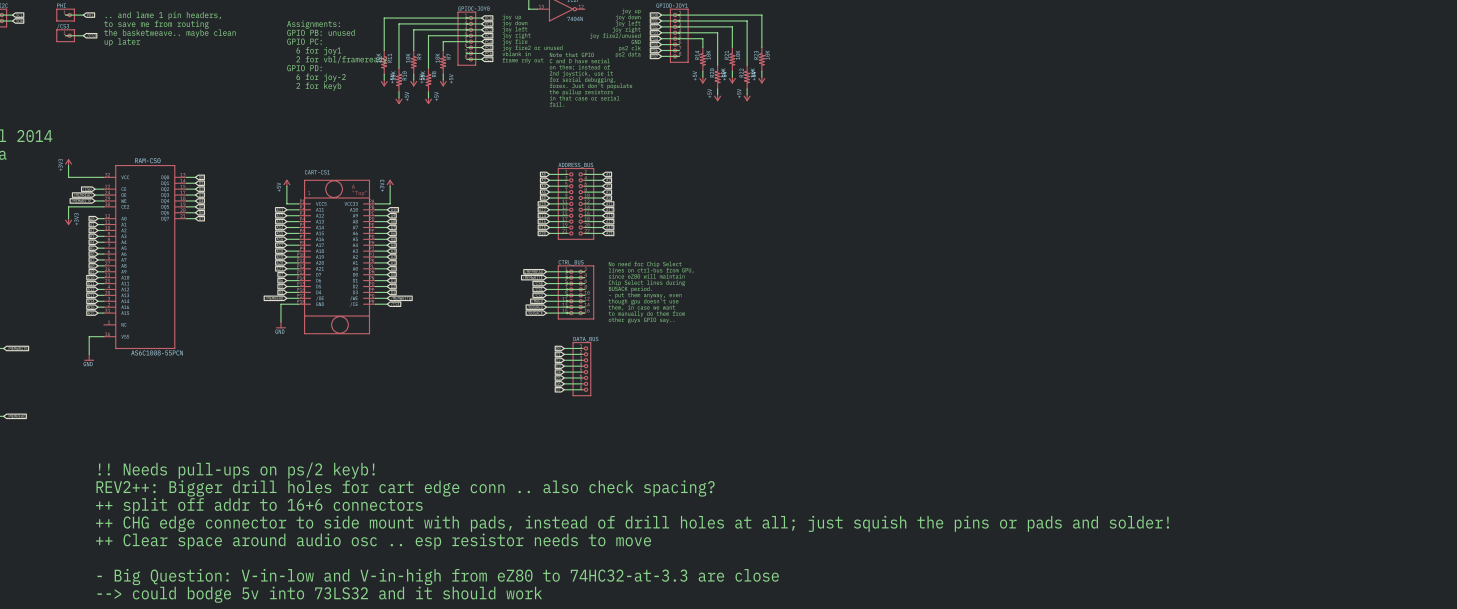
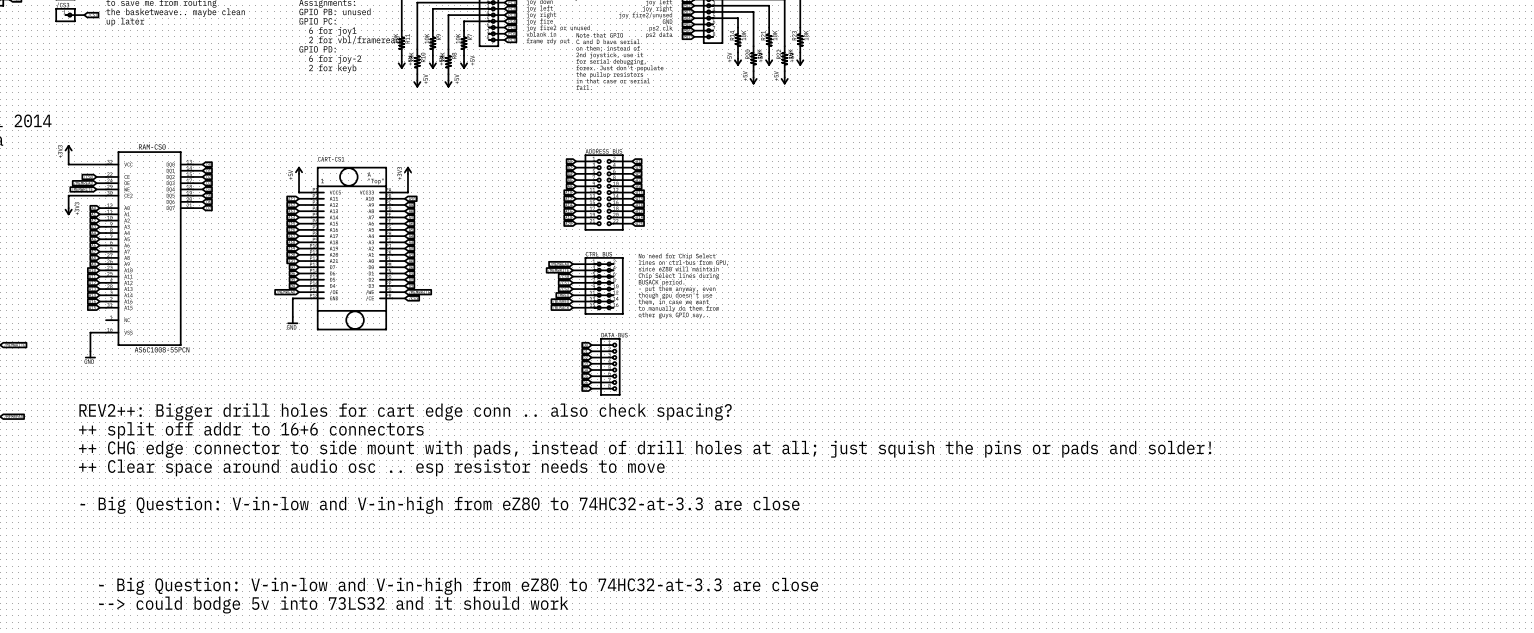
text: none -> REV2++: Bigger drill holes for cart edge conn .. also check spacing? (405, 411)
text: none -> ++ split off addr to 16+6 connectors (251, 430)
text: none -> ++ CHG edge connector to side mount with pads, instead of drill holes at all; just squish the pins or pads and solder! (645, 449)
text: none -> ++ Clear space around audio osc .. esp resistor needs to move (371, 467)
text: !! Needs pull-ups on ps/2 keyb! (236, 470) -> none
text: REV2++: Bigger drill holes for cart edge conn .. also check spacing? (405, 488) -> none
text: none -> - Big Question: V-in-low and V-in-high from eZ80 to 74HC32-at-3.3 are close (439, 505)
text: ++ split off addr to 16+6 connectors (259, 506) -> none
text: ++ CHG edge connector to side mount with pads, instead of drill holes at all; just squish the pins or pads and solder! (632, 523) -> none
text: ++ Clear space around audio osc .. esp resistor needs to move (373, 541) -> none

